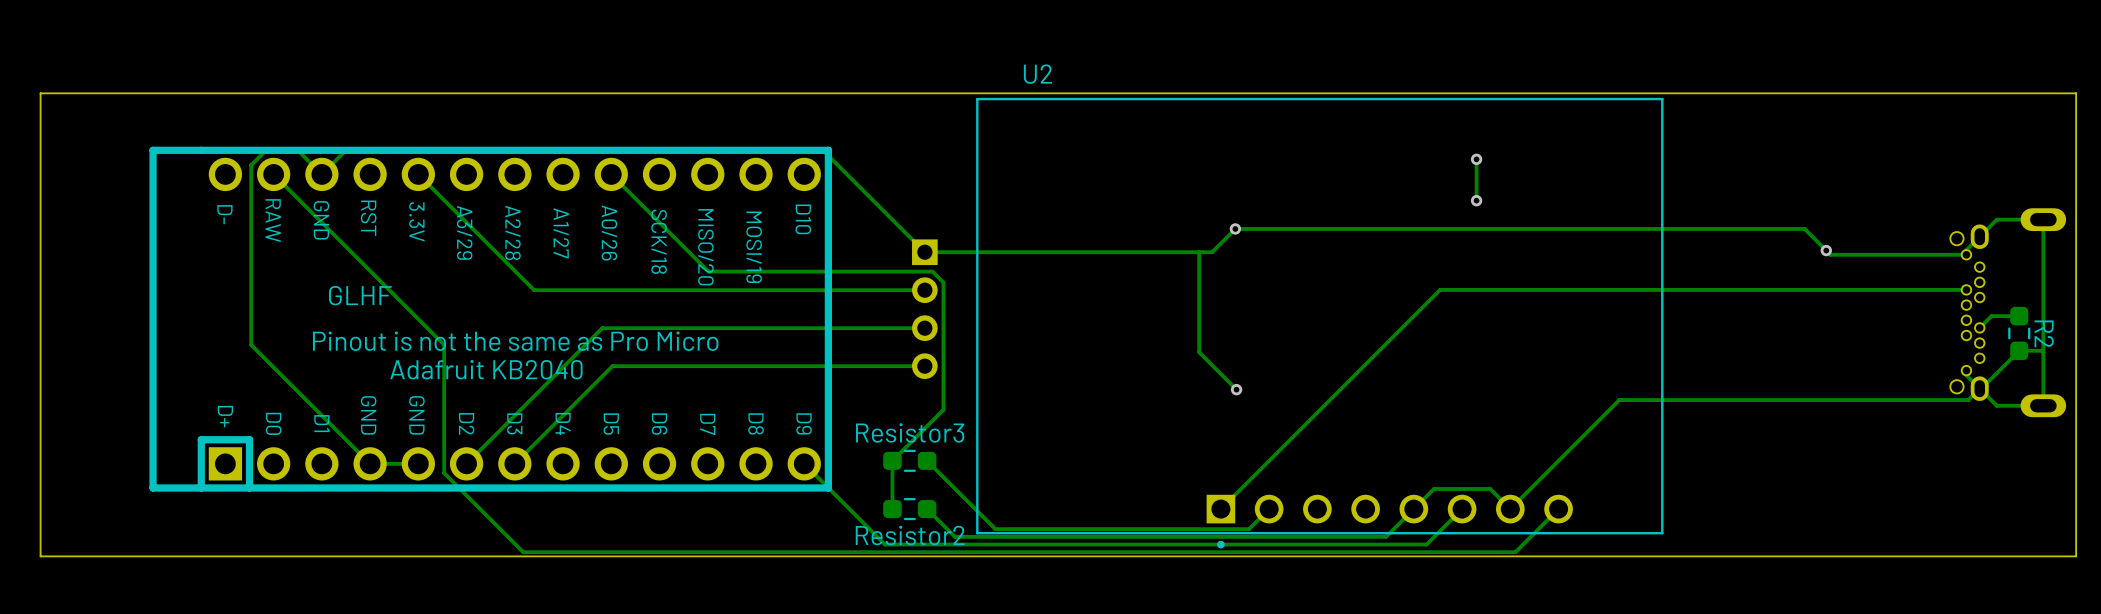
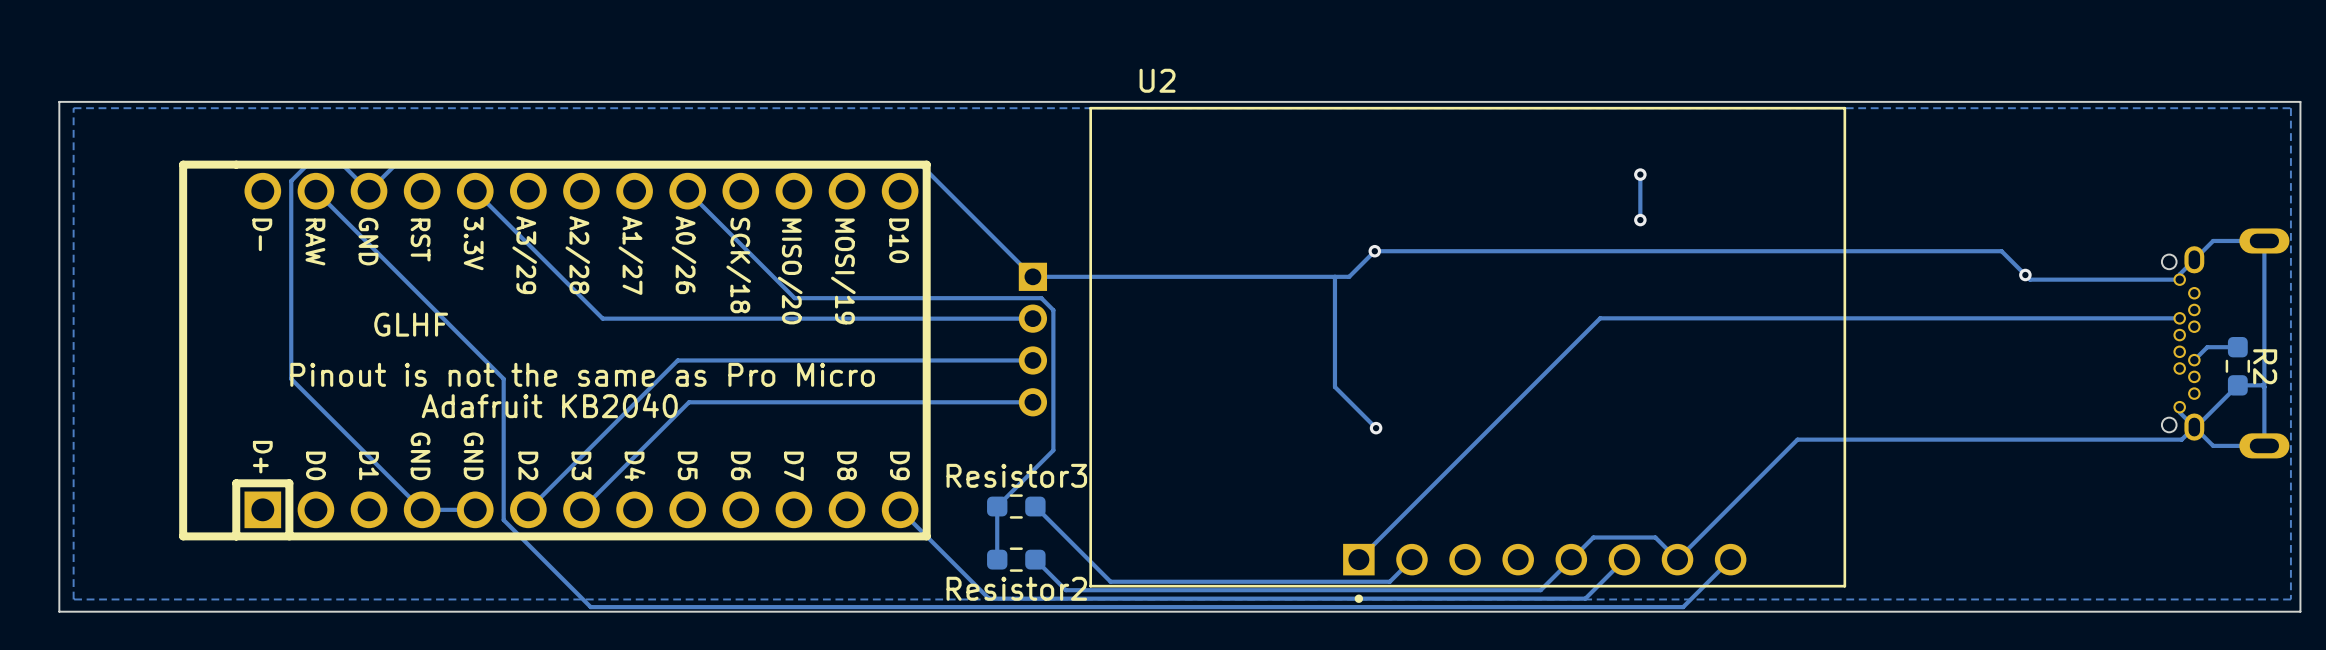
zone outline: none -> (2290, 108) (2290, 599) (73, 599) (73, 108) (2290, 108)

